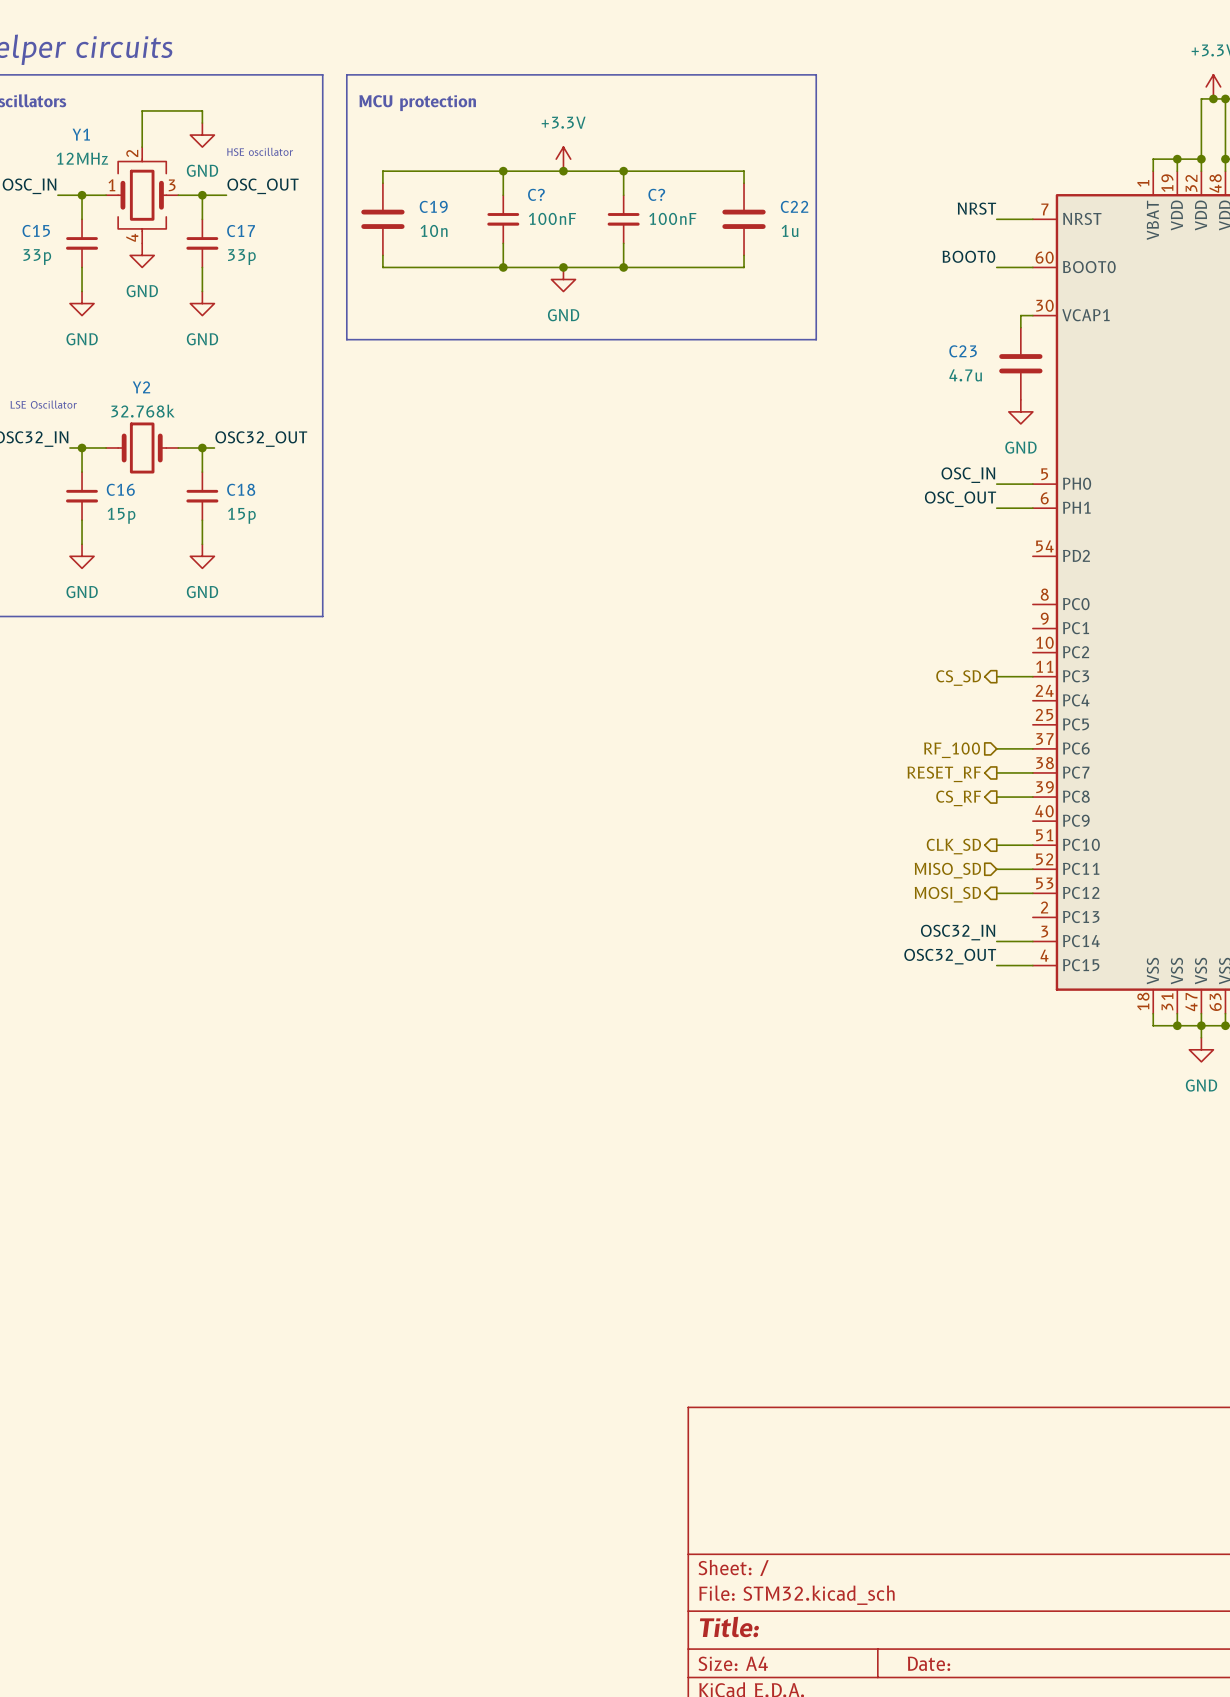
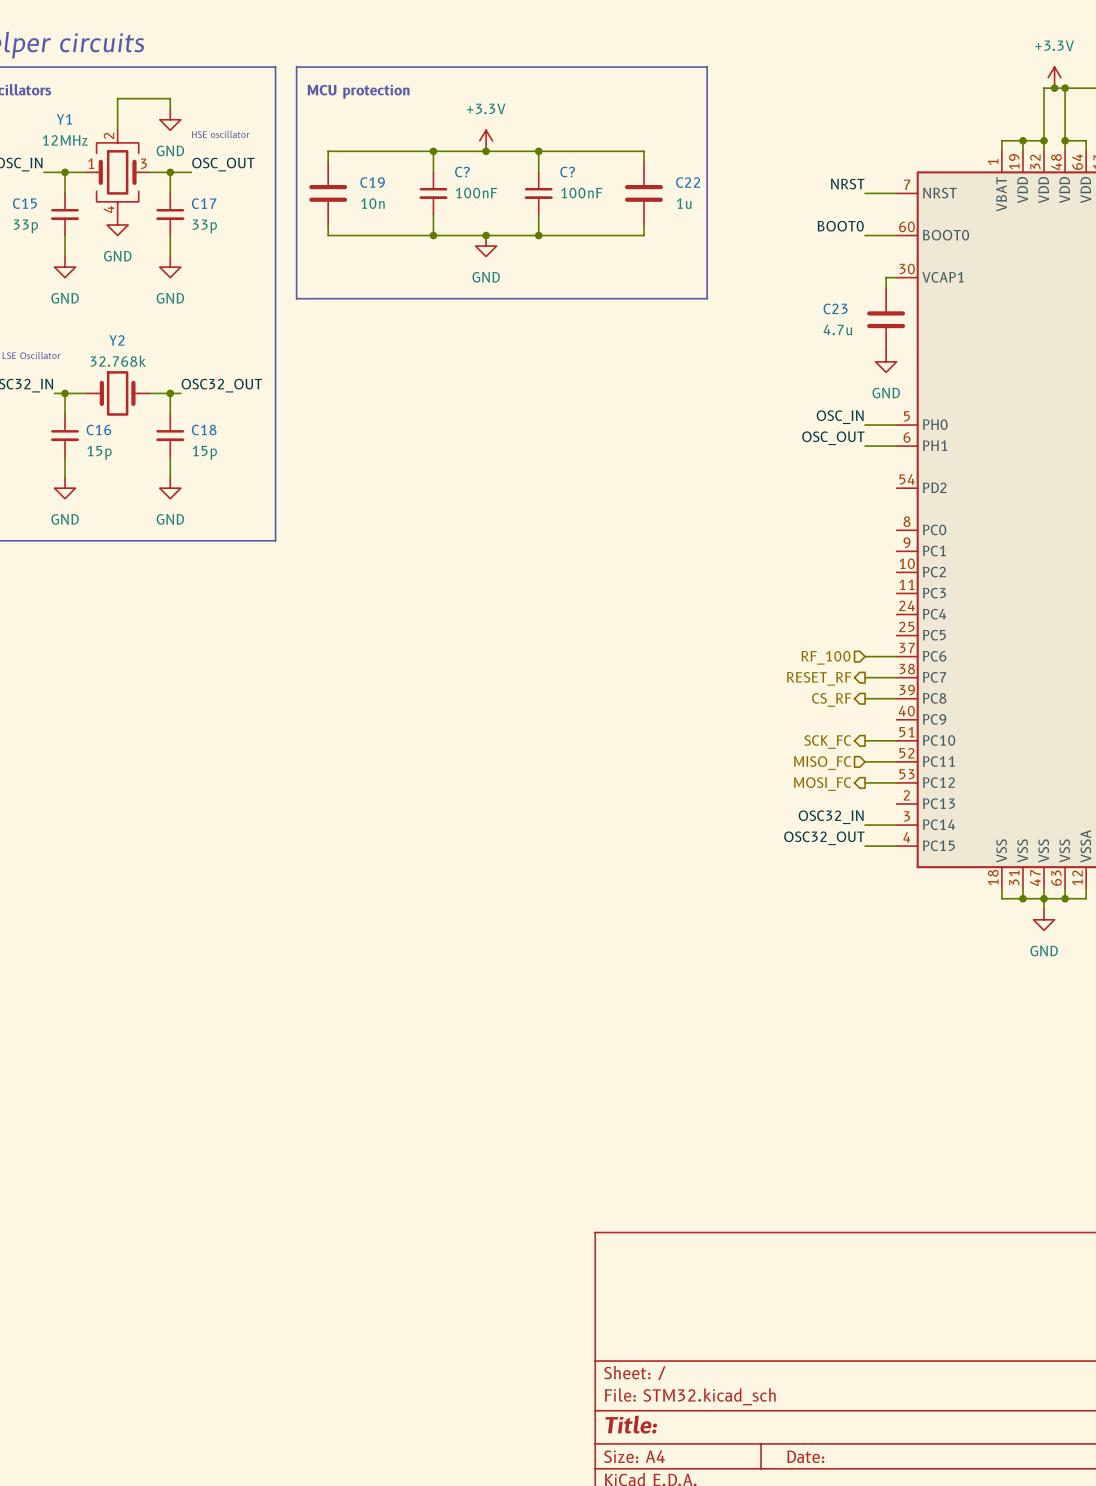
wire: (996, 676) (1032, 676) -> none
hierarchical label: CS_SD (958, 678) -> none
hierarchical label: CLK_SD (953, 846) -> SCK_FC (827, 742)
hierarchical label: MISO_SD (947, 870) -> MISO_FC (822, 763)
hierarchical label: MOSI_SD (947, 894) -> MOSI_FC (822, 784)

